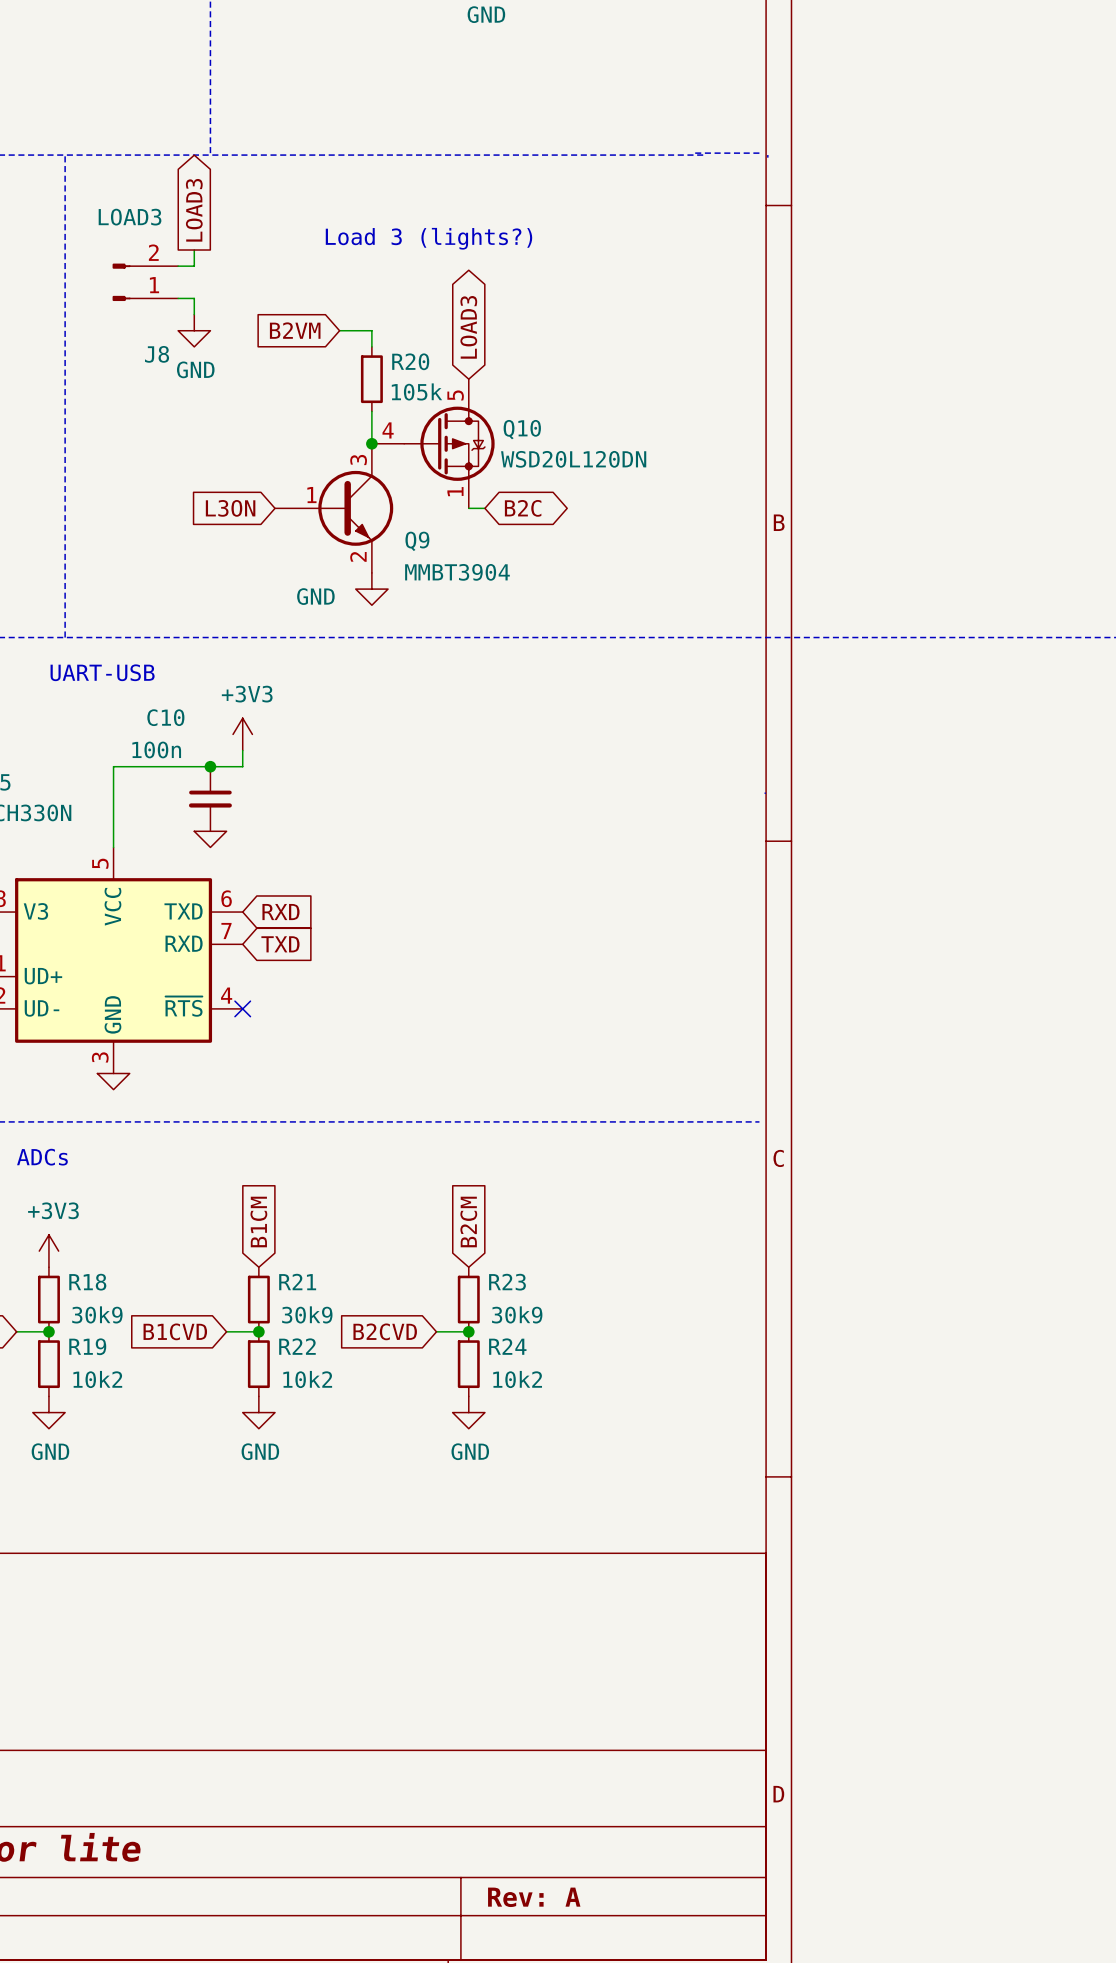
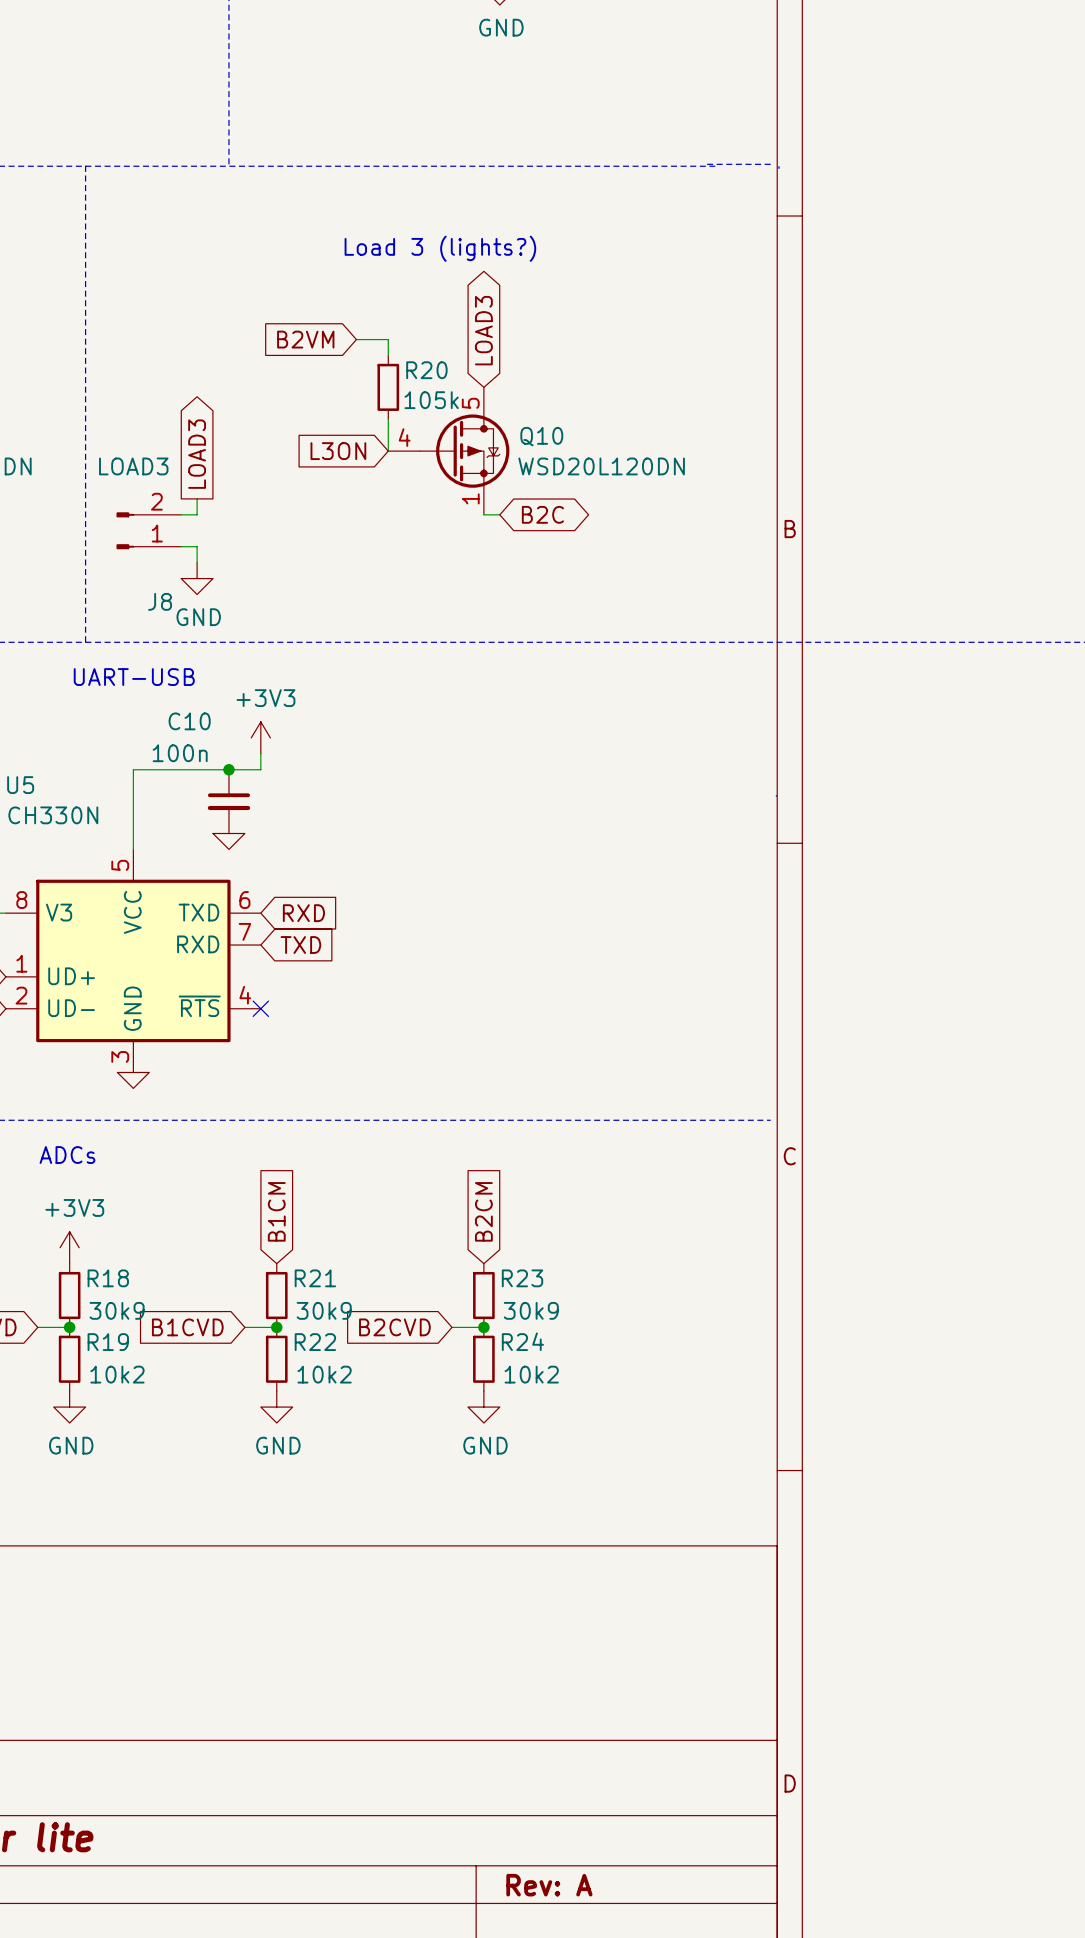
global label position: LOAD3 (194, 210) -> LOAD3 (197, 454)
wire: (194, 250) (194, 266) (178, 266) -> (197, 498) (197, 514) (181, 514)
J8 position: (145, 282) -> (148, 530)
wire: (178, 298) (194, 298) (194, 314) -> (181, 546) (197, 546) (197, 562)
power symbol: GND (194, 330) -> none
junction: (371, 443) -> none
global label position: L3ON (230, 508) -> L3ON (338, 451)
Q9: MMBT3904 (334, 508) -> none
power symbol: none -> GND (197, 578)
power symbol: GND (371, 589) -> none

